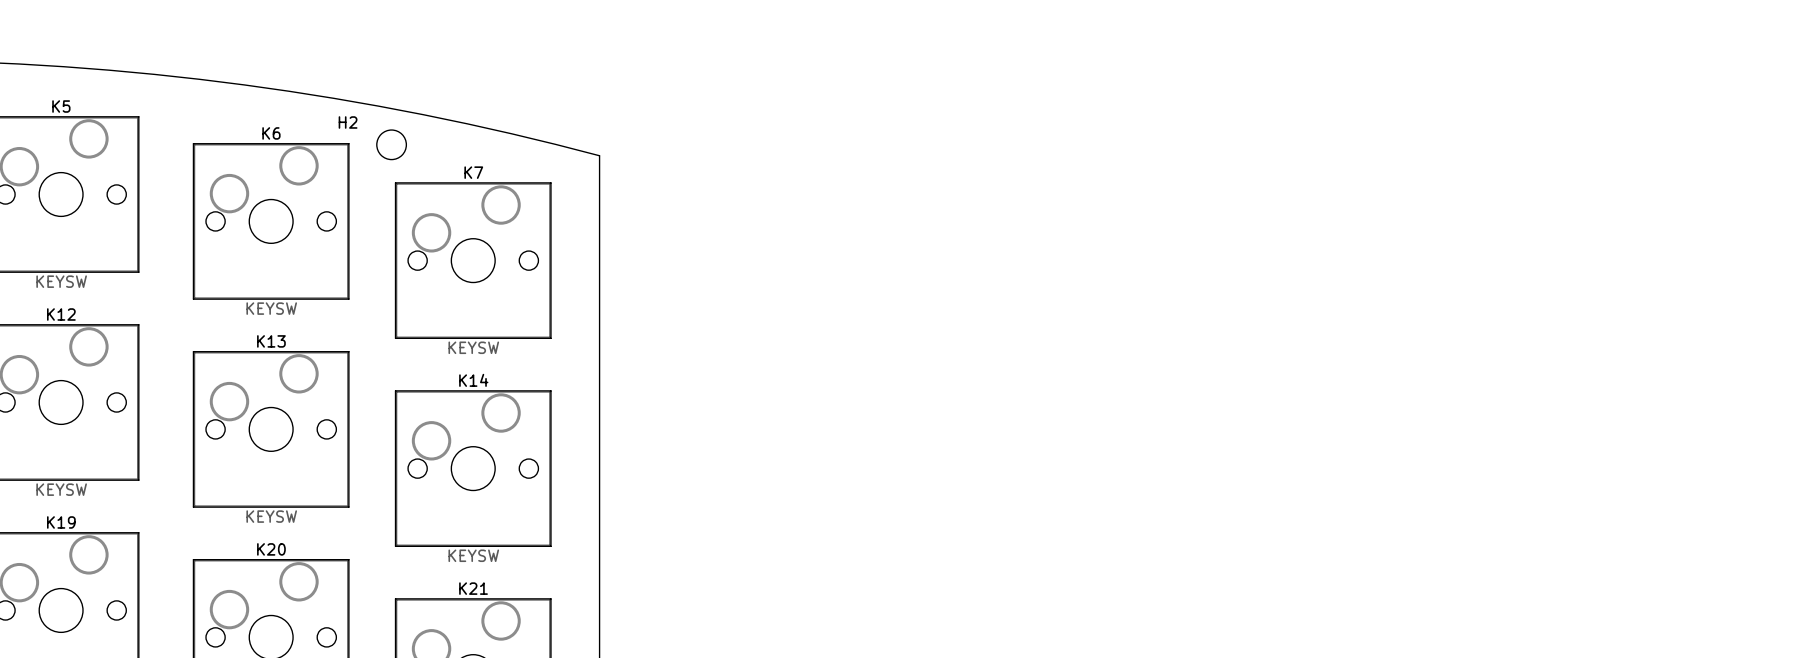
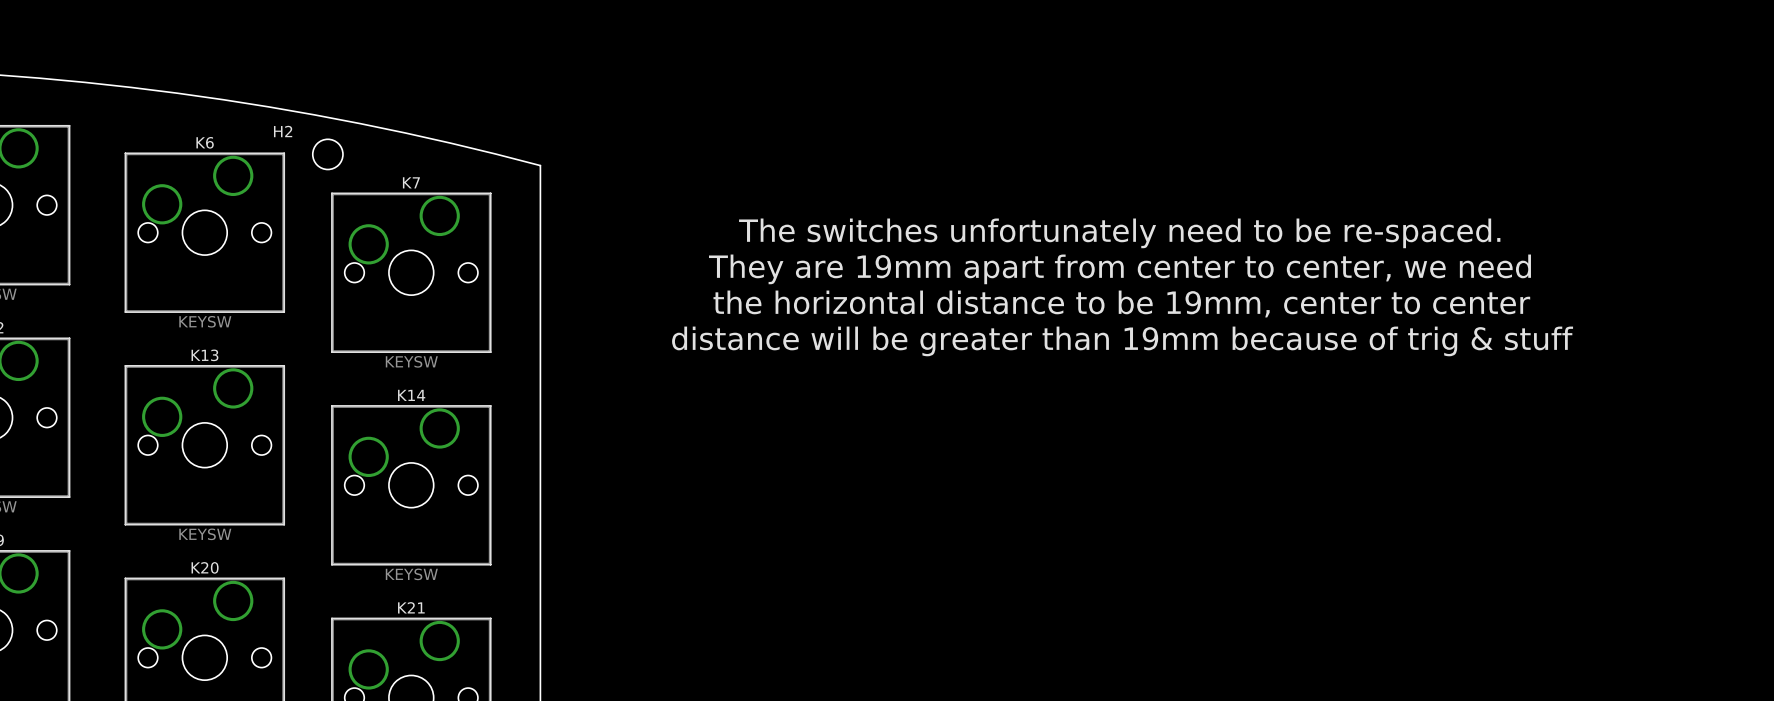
text: none -> The switches unfortunately need to be re-spaced. (1119, 233)
text: none -> They are 19mm apart from center to center, we need (1119, 269)
text: none -> the horizontal distance to be 19mm, center to center (1121, 303)
text: none -> distance will be greater than 19mm because of trig & stuff (1122, 341)

